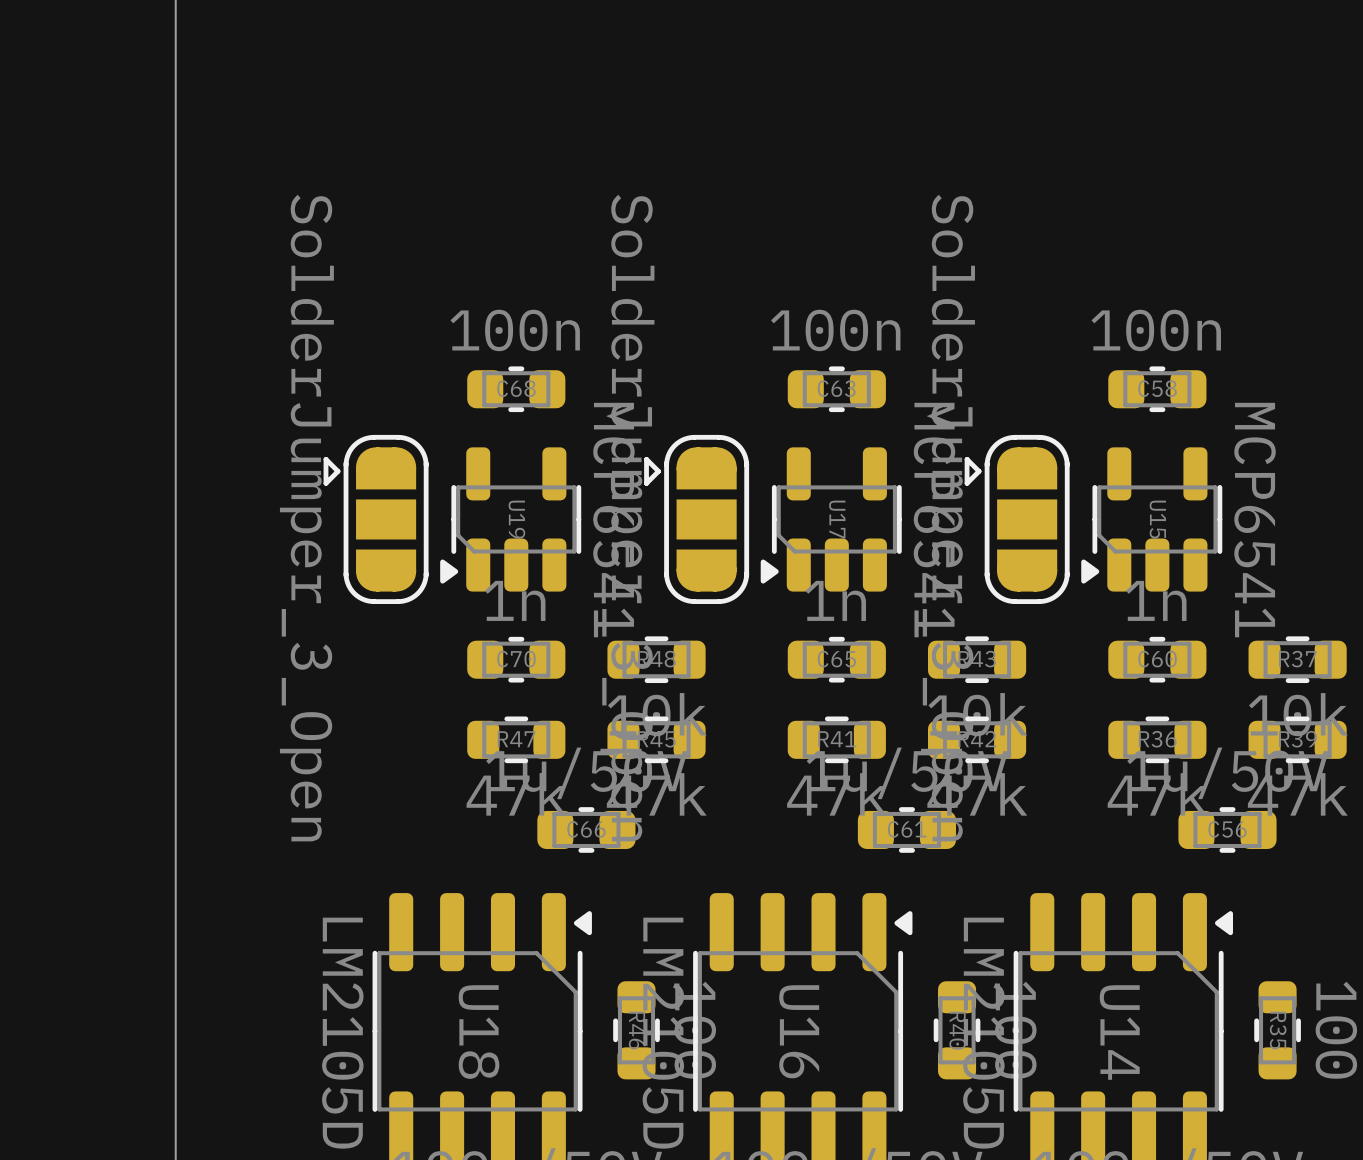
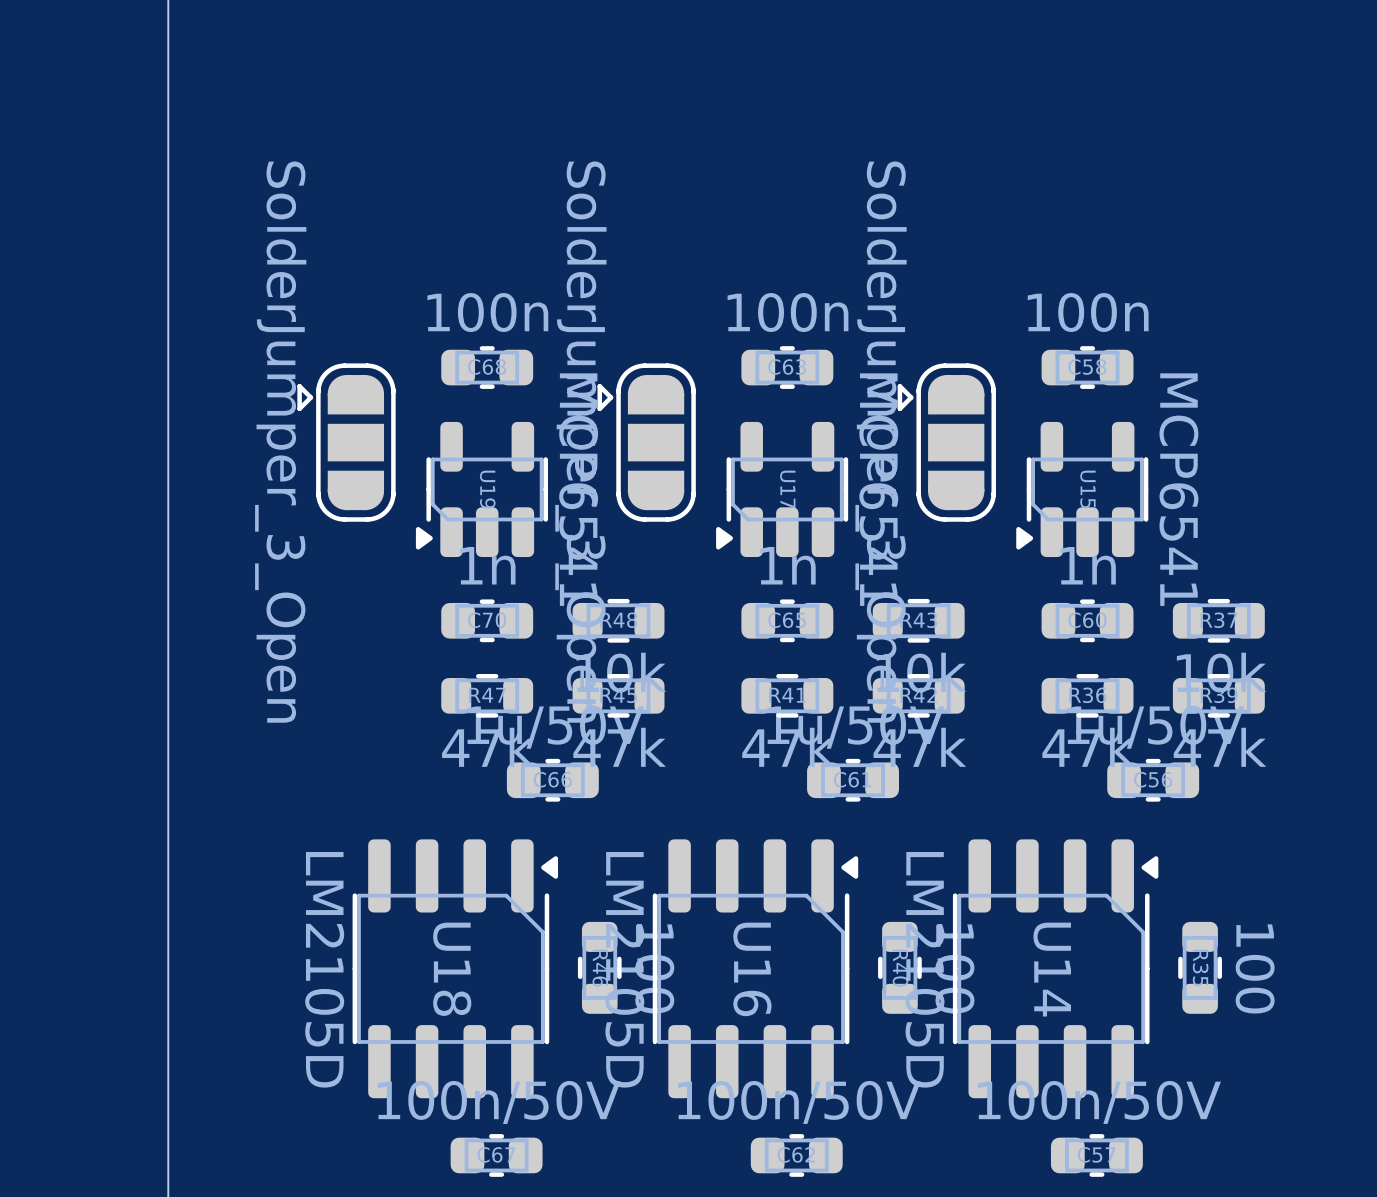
part position: (376, 519) -> (346, 442)
part position: (696, 519) -> (646, 442)
part position: (1017, 519) -> (946, 442)

